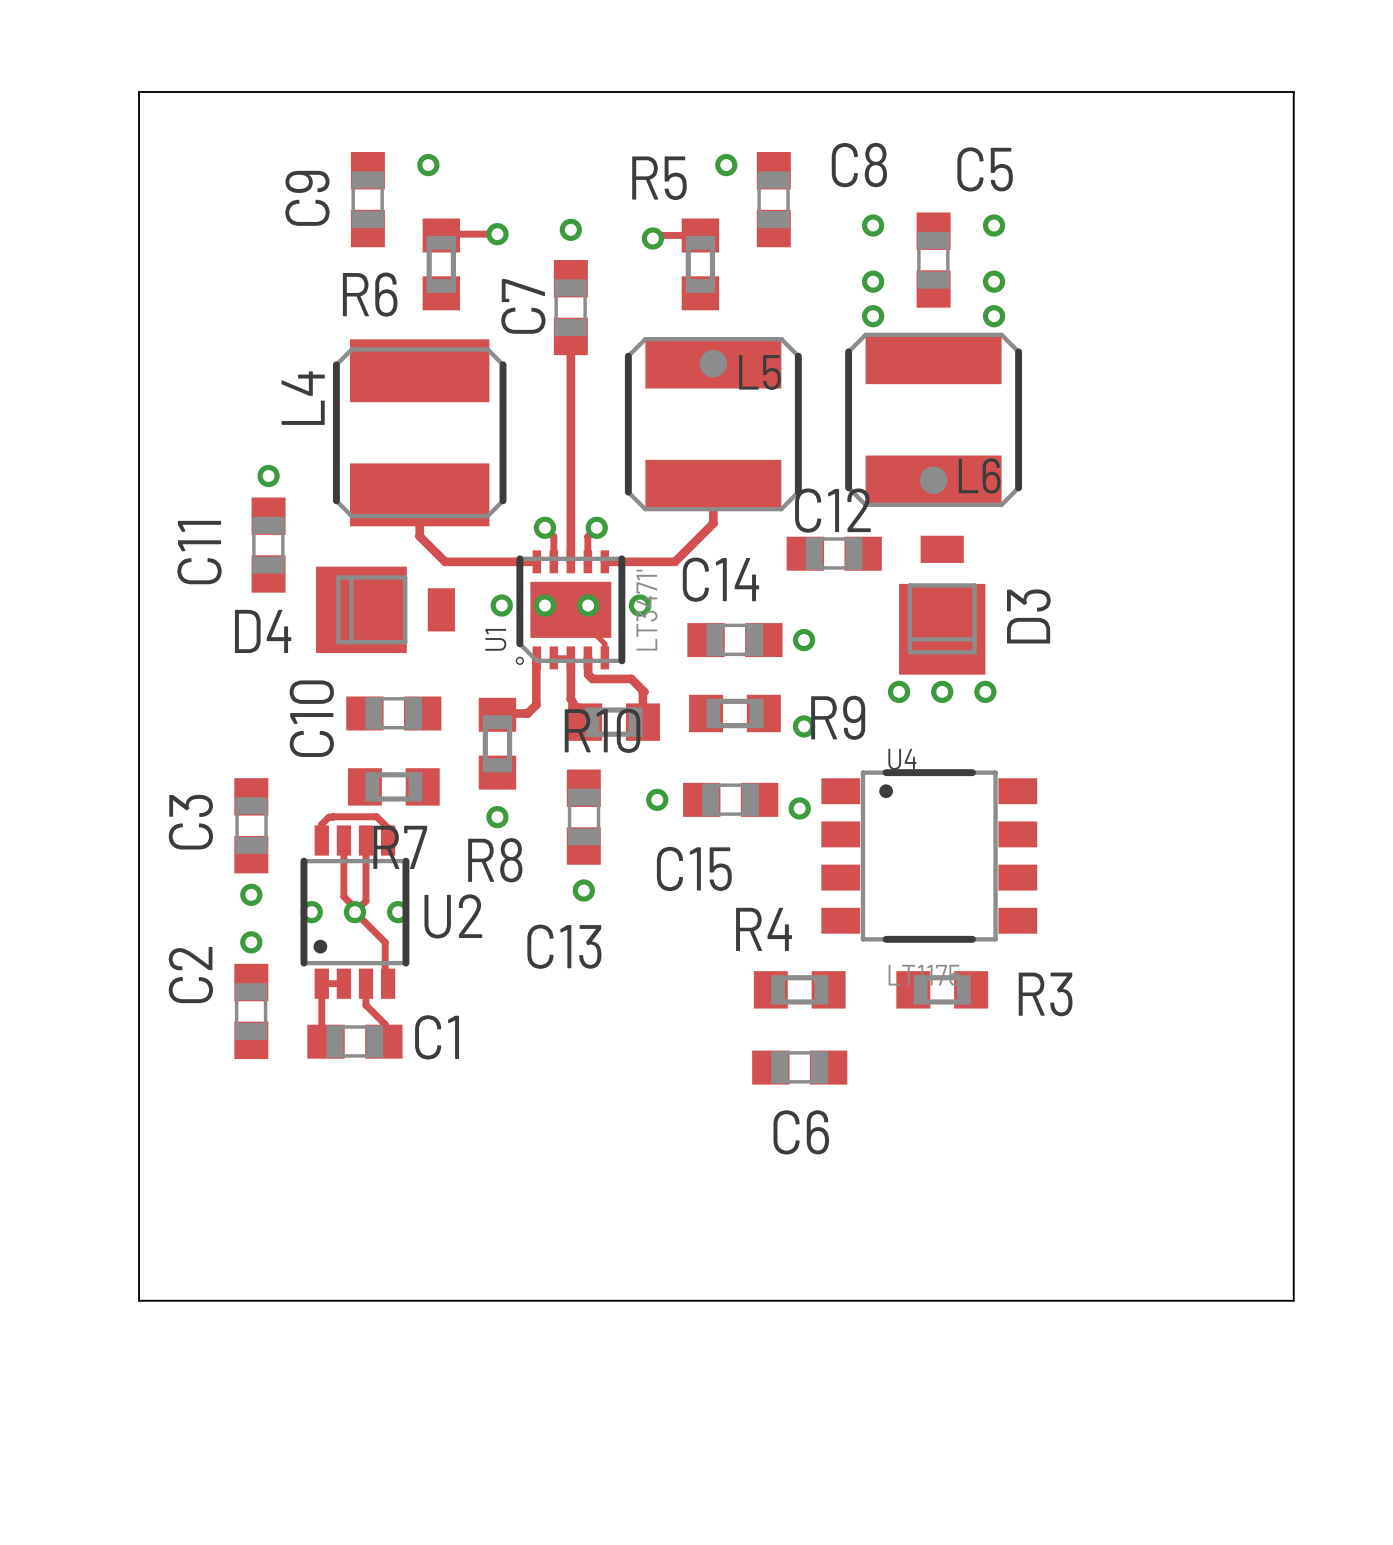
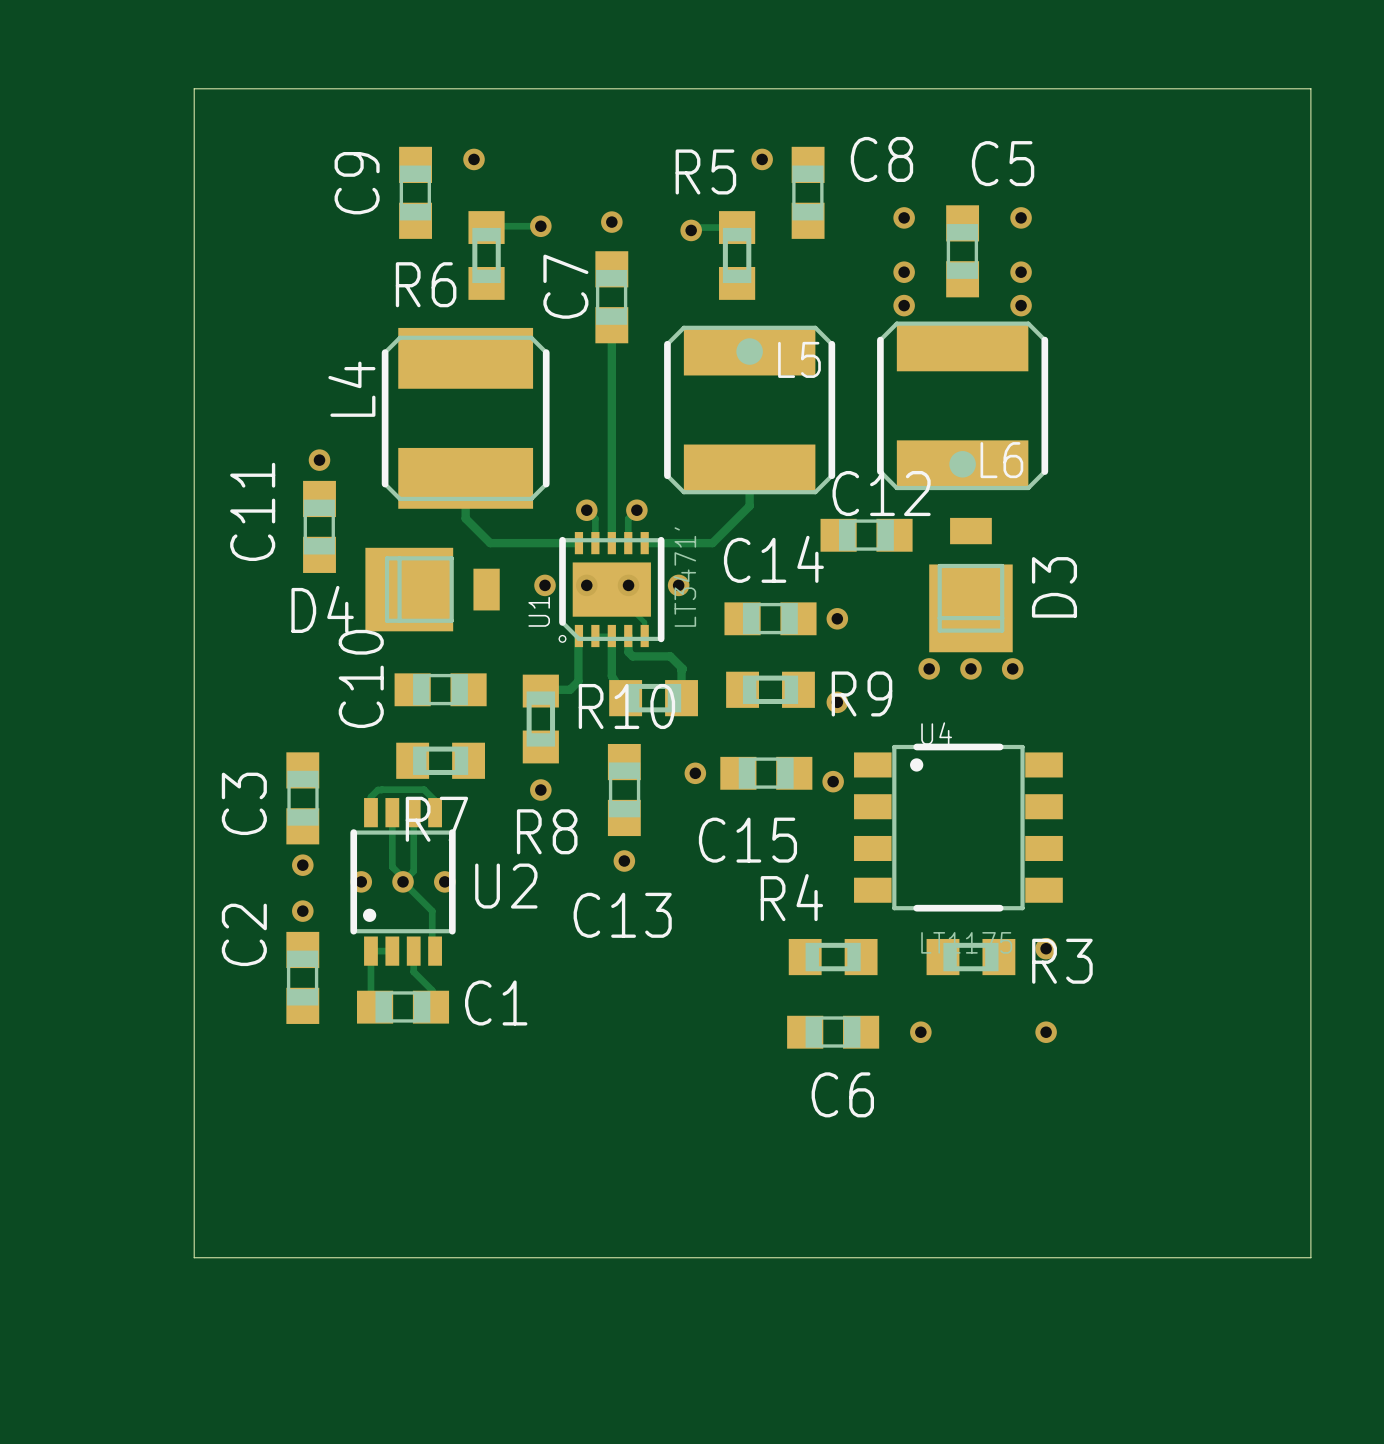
via: none -> (1046, 948)
via: none -> (920, 1032)
via: none -> (1046, 1032)

